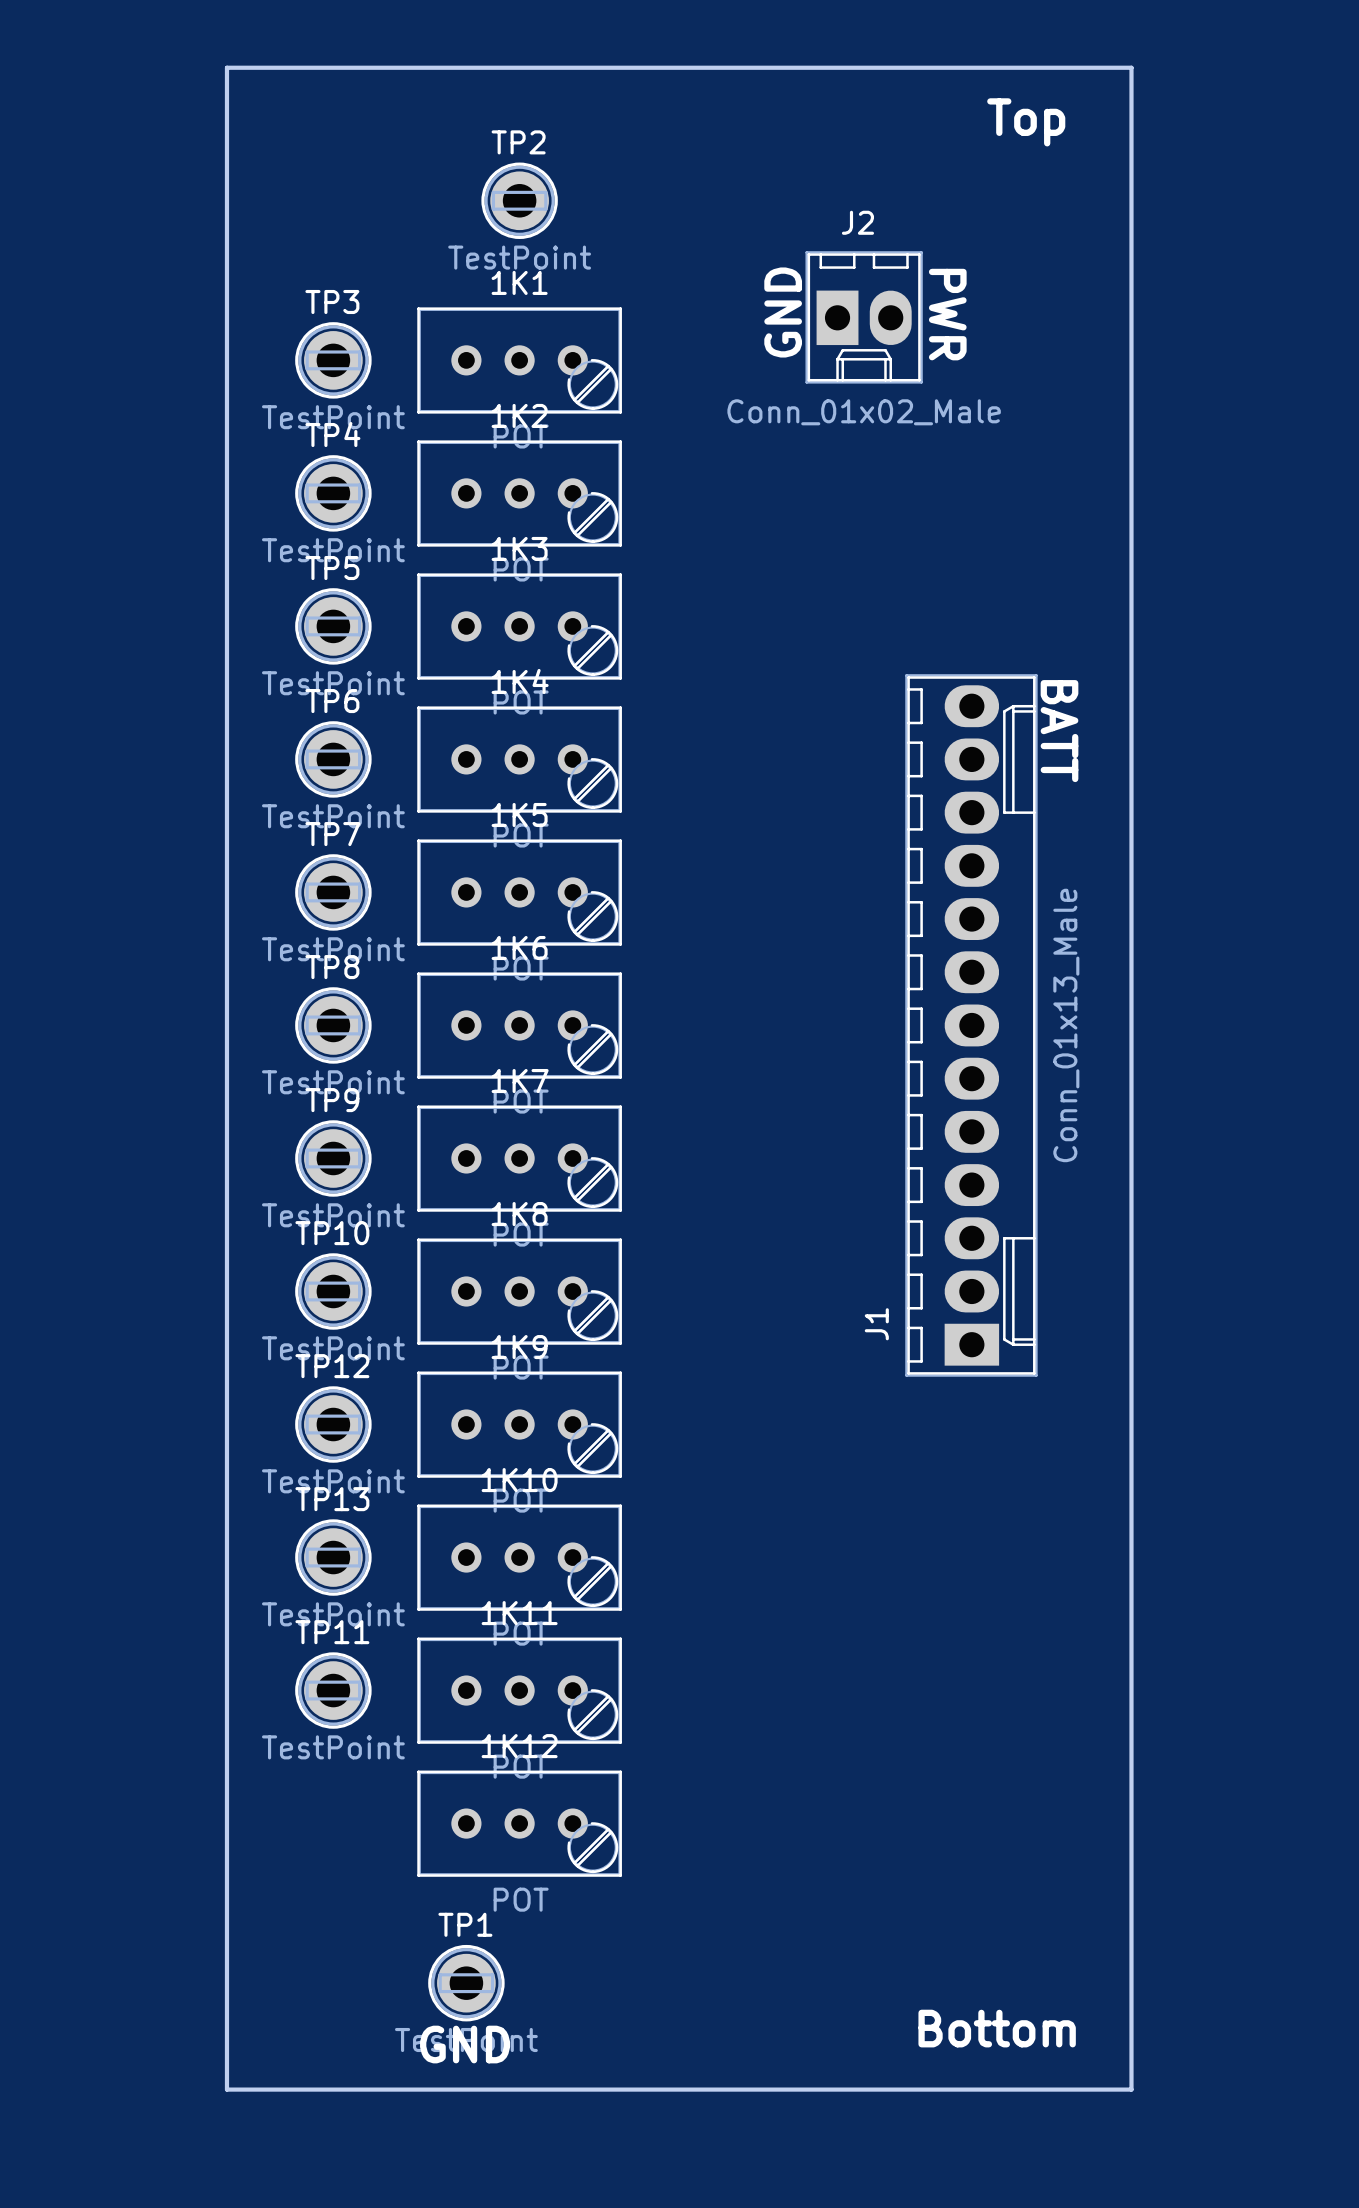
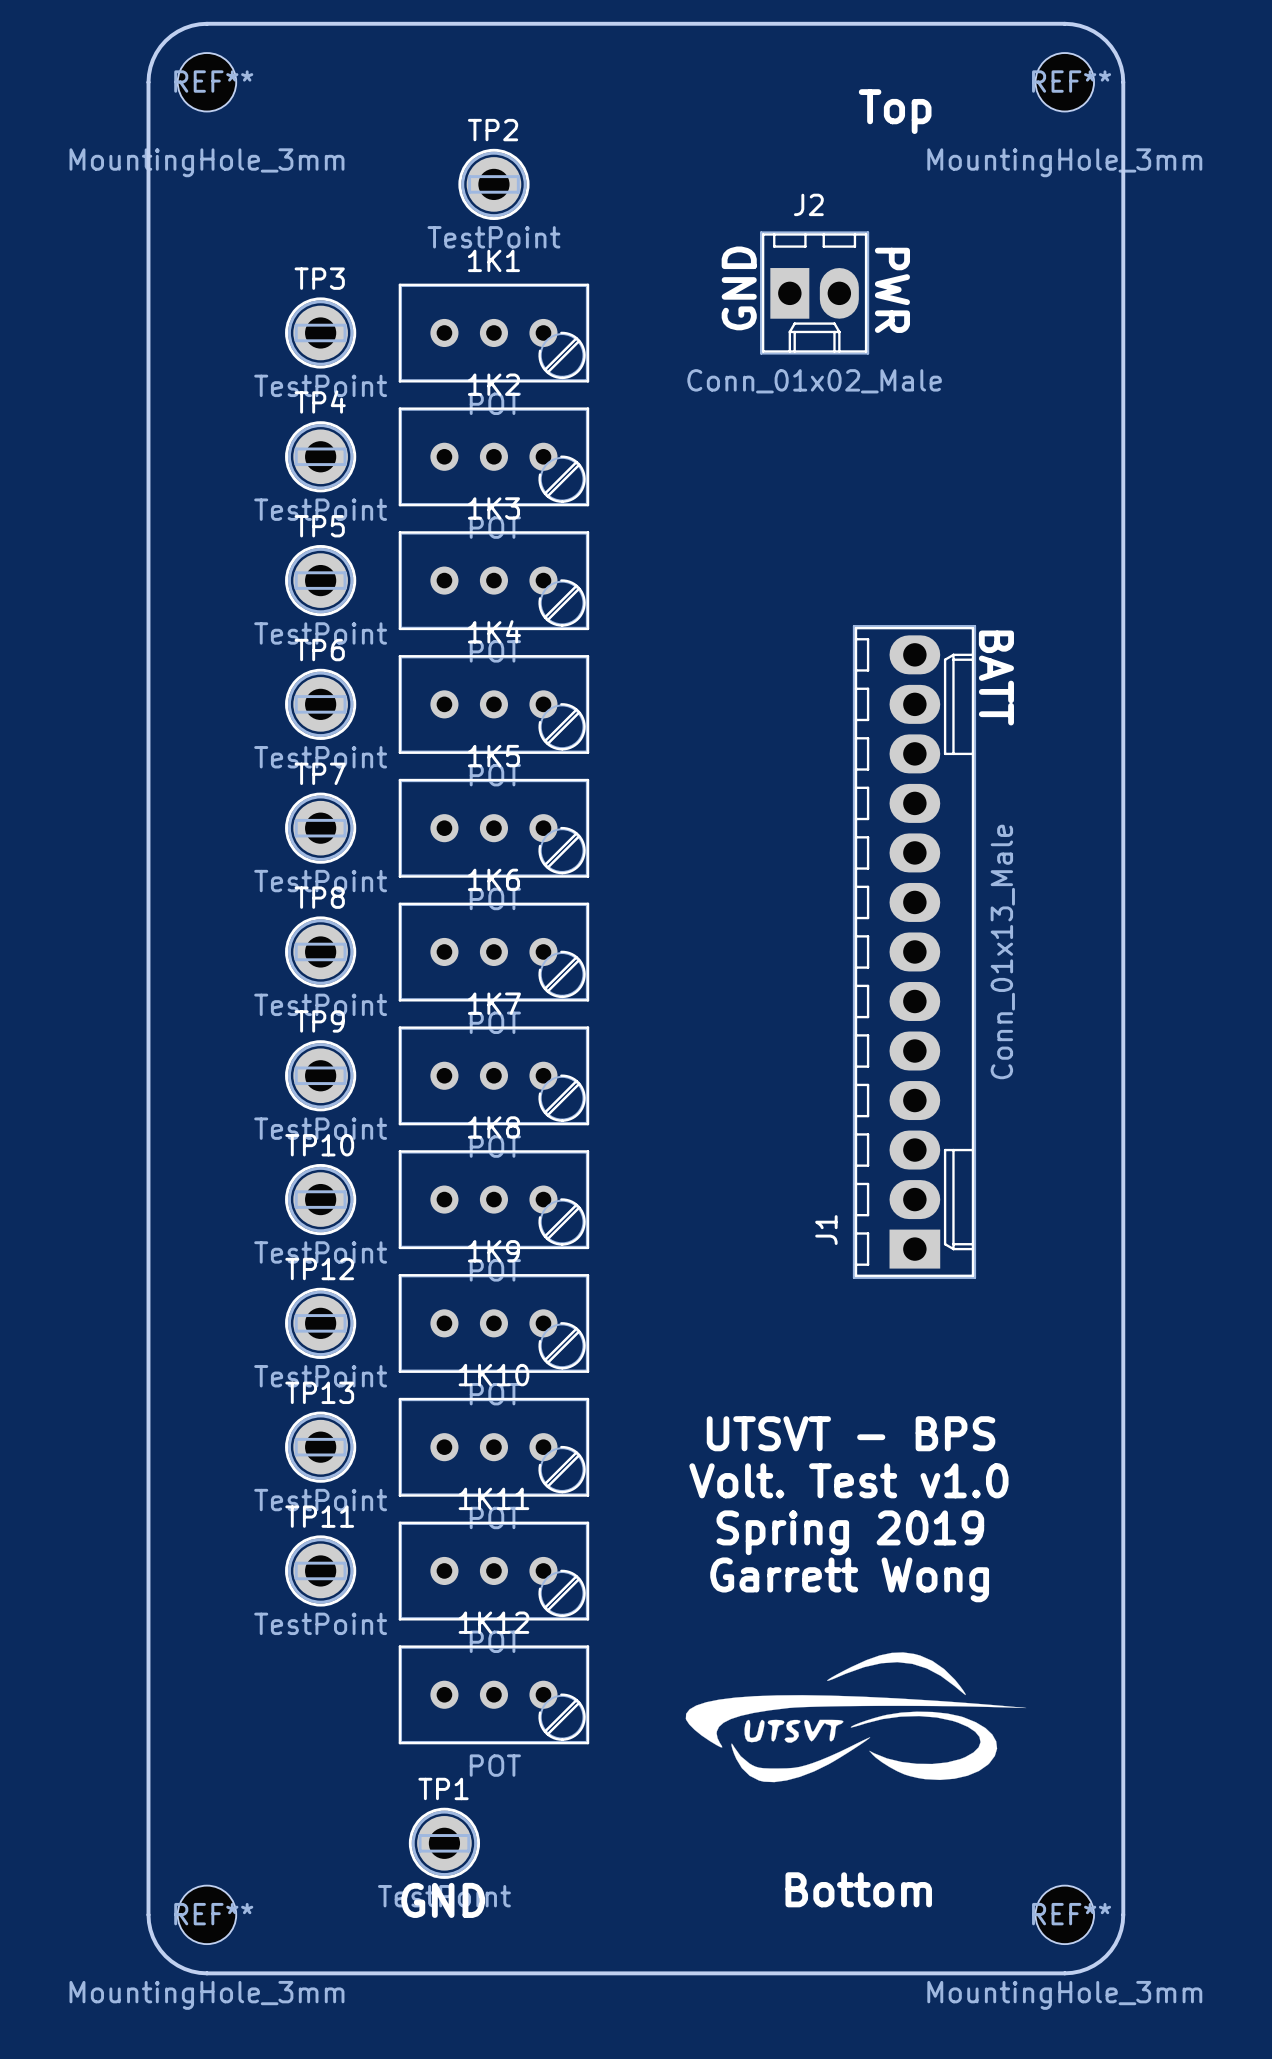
board edge: (226, 67) (1131, 67) (1131, 2089) (226, 2089) (226, 67) -> (206, 23) (184, 28) (165, 40) (152, 59) (148, 82) (148, 1914) (152, 1937) (160, 1950) (171, 1961) (191, 1971) (206, 1973) (1064, 1973) (1087, 1968) (1100, 1961) (1111, 1950) (1121, 1930) (1123, 1914) (1123, 82) (1118, 59) (1111, 46) (1100, 35) (1079, 25) (1064, 23) (206, 23)
REF**: none -> MountingHole_3mm (206, 82)
REF**: none -> MountingHole_3mm (1064, 82)
text position: Top (1026, 122) -> Top (895, 111)
text: none -> UTSVT - BPS (851, 1433)
text: none -> Volt. Test v1.0 (848, 1480)
text: none -> Spring 2019 (850, 1532)
text: none -> Garrett Wong (849, 1579)
drawing: none -> [685, 1652, 1027, 1783]
text position: Bottom (997, 2028) -> Bottom (858, 1889)
REF**: none -> MountingHole_3mm (206, 1914)
REF**: none -> MountingHole_3mm (1064, 1914)

